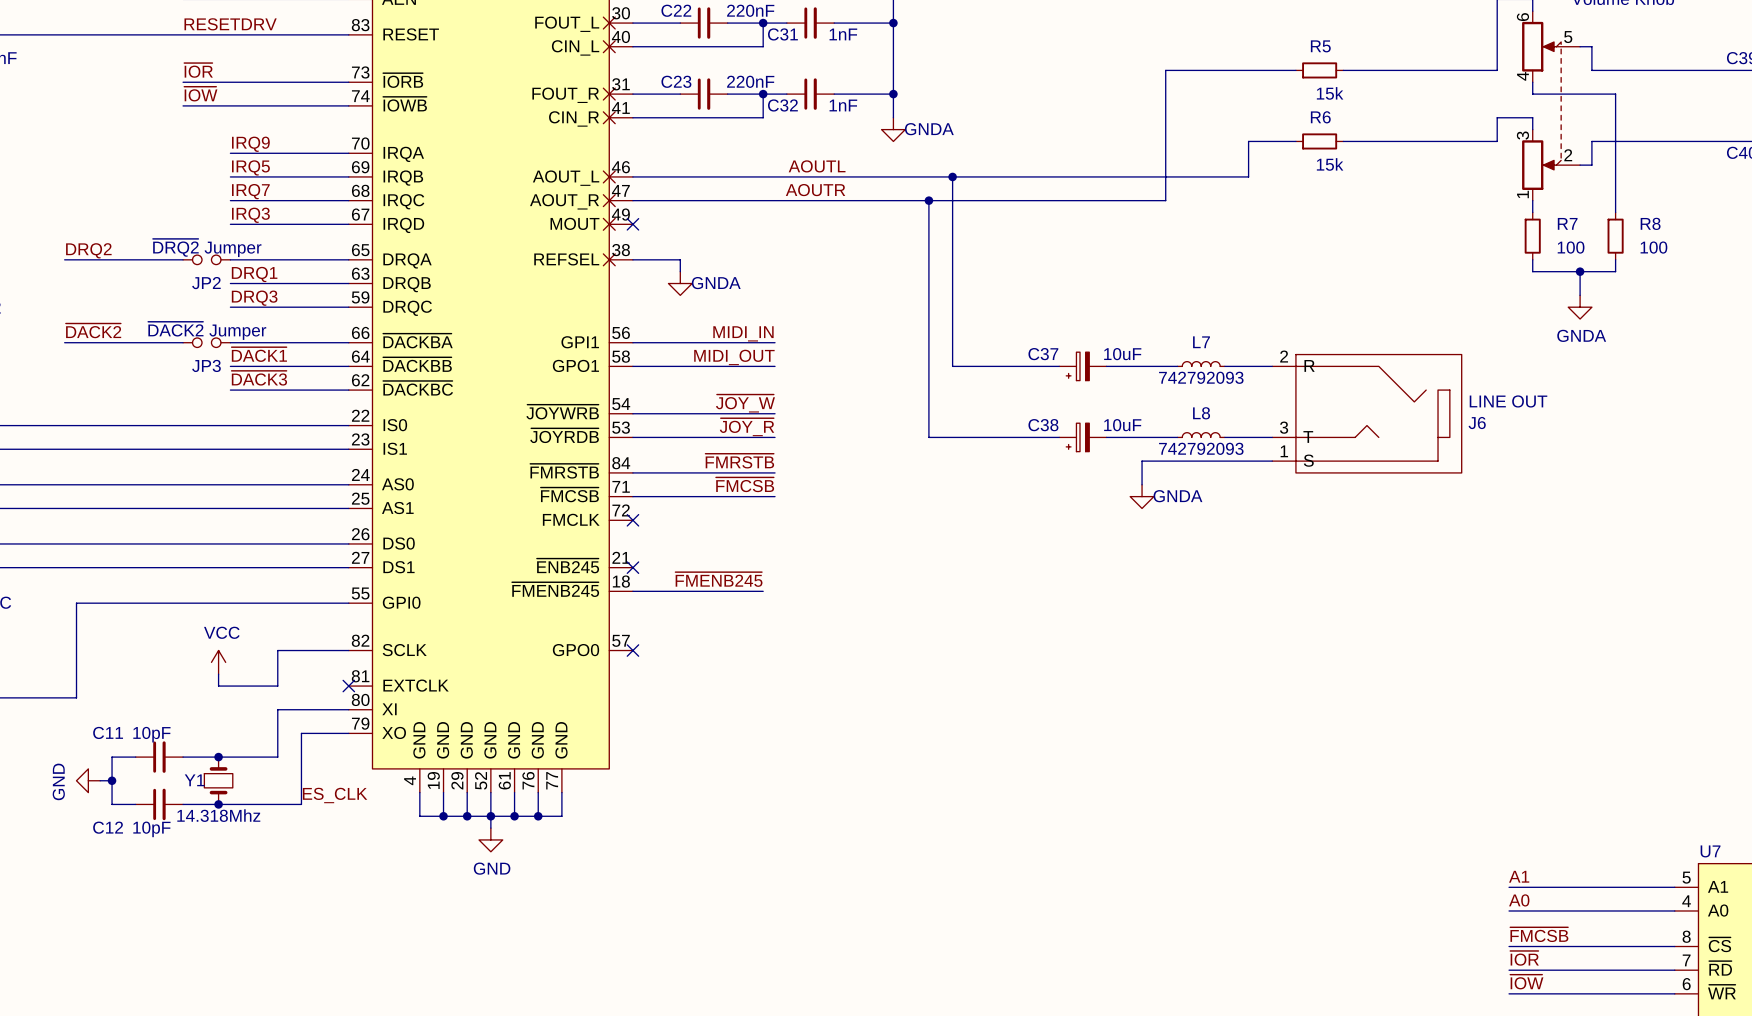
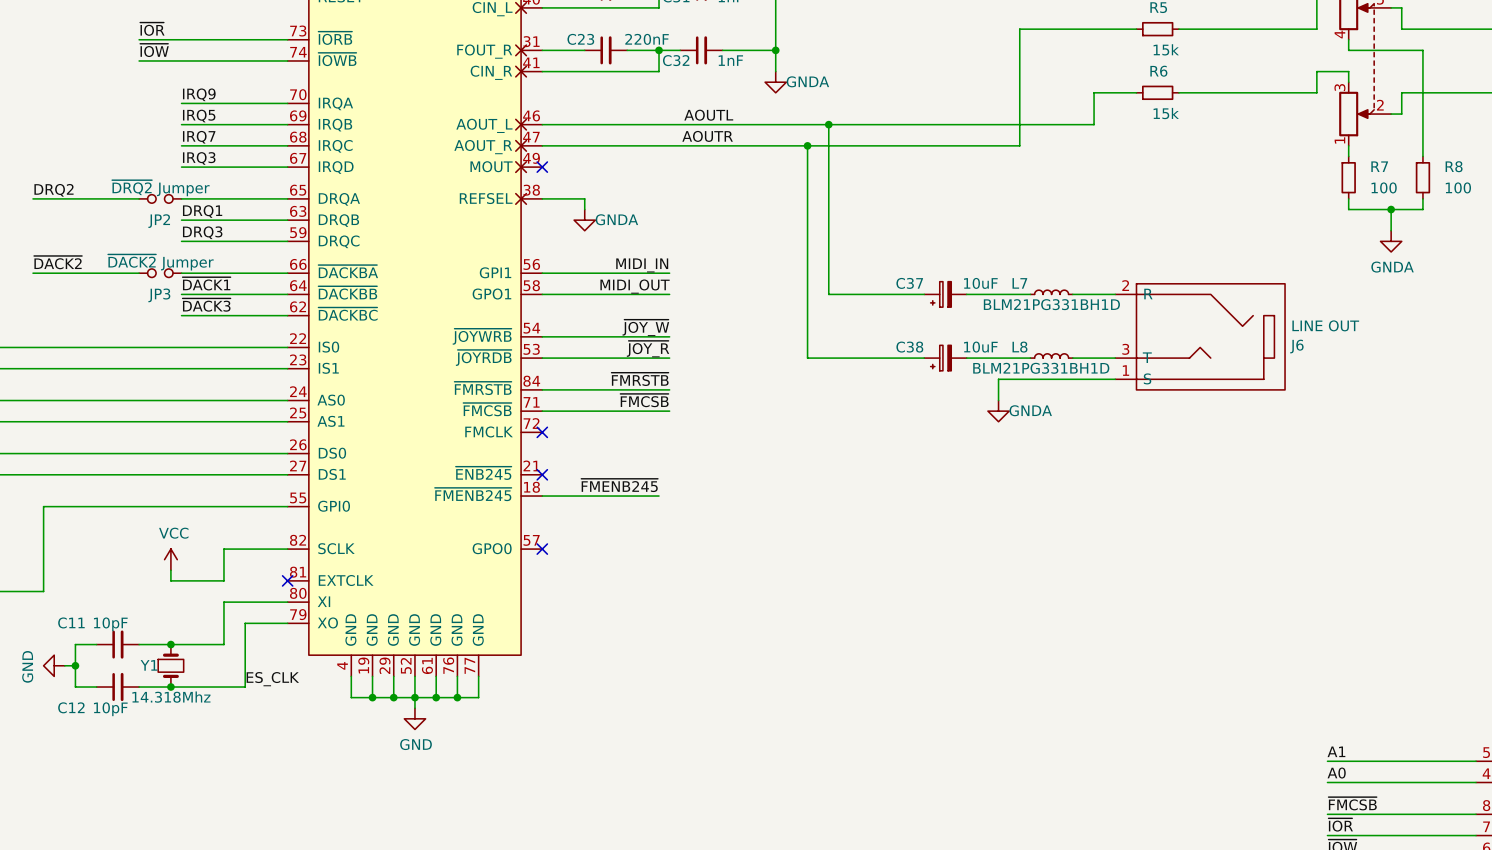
L7 name position: L7 (1201, 342) -> L7 (1019, 283)
L7 value: 742792093 (1201, 377) -> BLM21PG331BH1D (1051, 304)
L8 name position: L8 (1201, 413) -> L8 (1019, 347)
L8 value: 742792093 (1201, 448) -> BLM21PG331BH1D (1041, 368)

